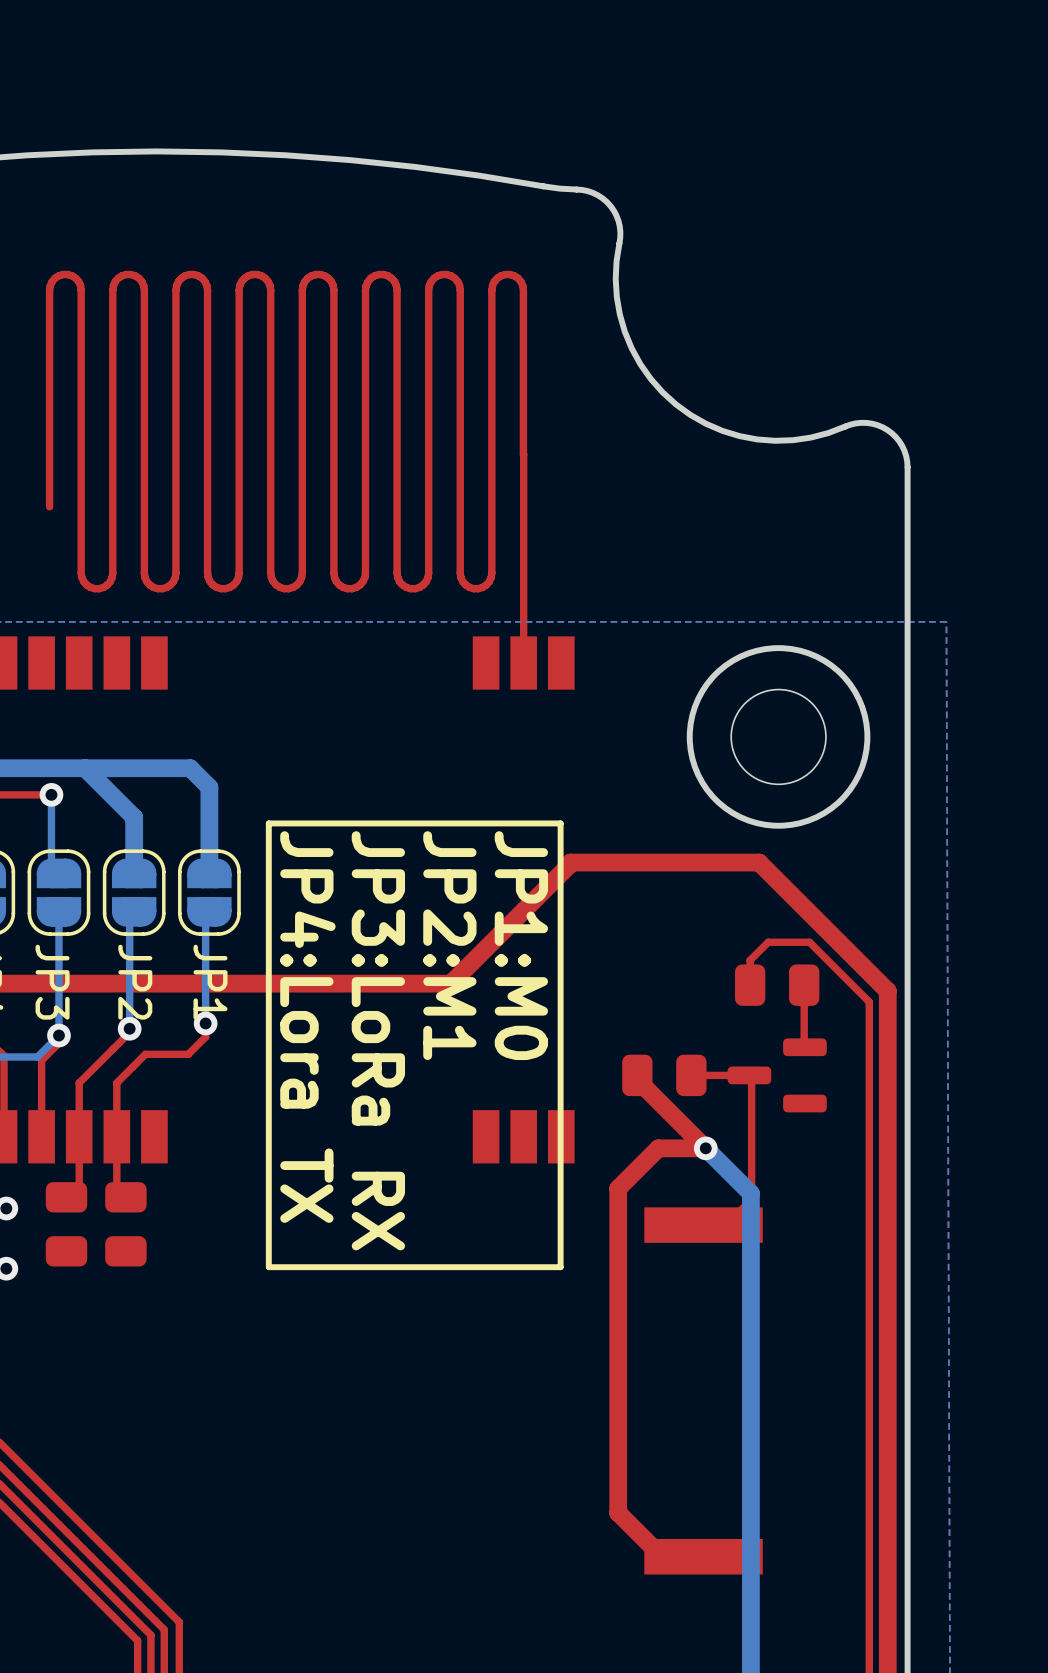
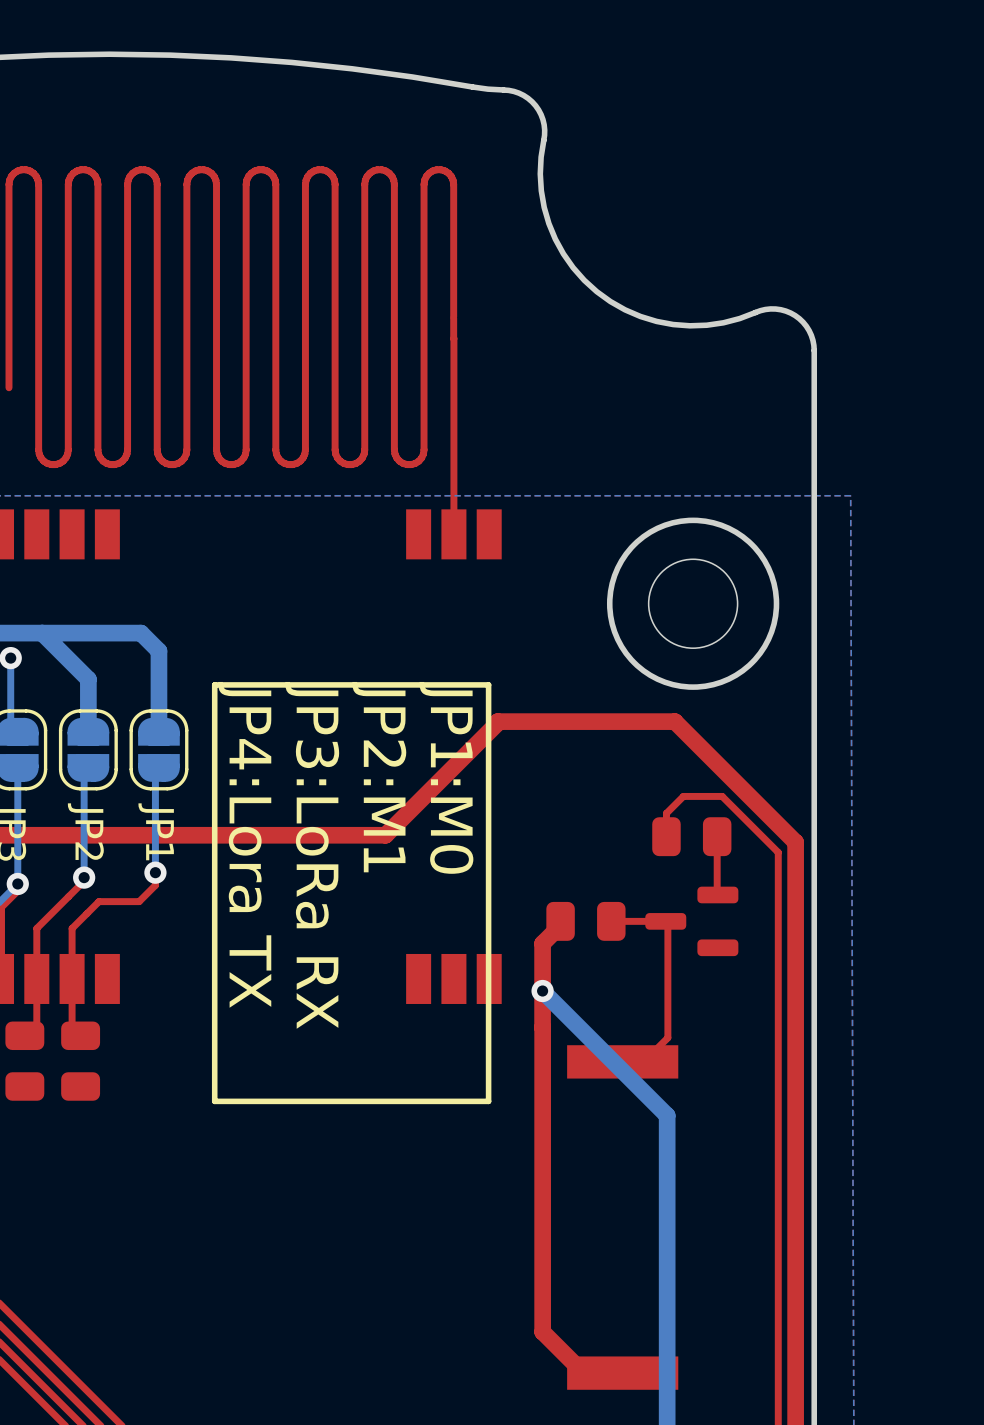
top track: (637, 1079) (705, 1148) (658, 1148) (618, 1188) -> (560, 925) (542, 943) (542, 1027)
bottom track: (705, 1148) (750, 1193) (750, 1282) -> (542, 991) (667, 1115)
via position: (705, 1148) -> (542, 991)

